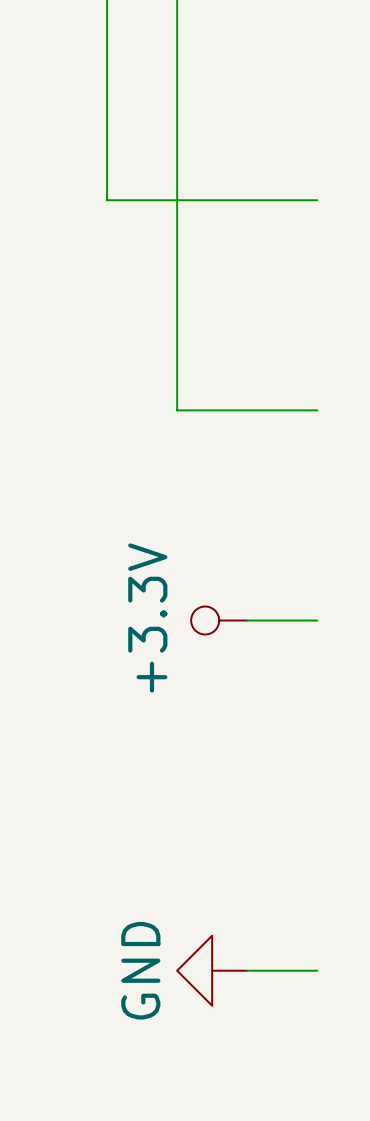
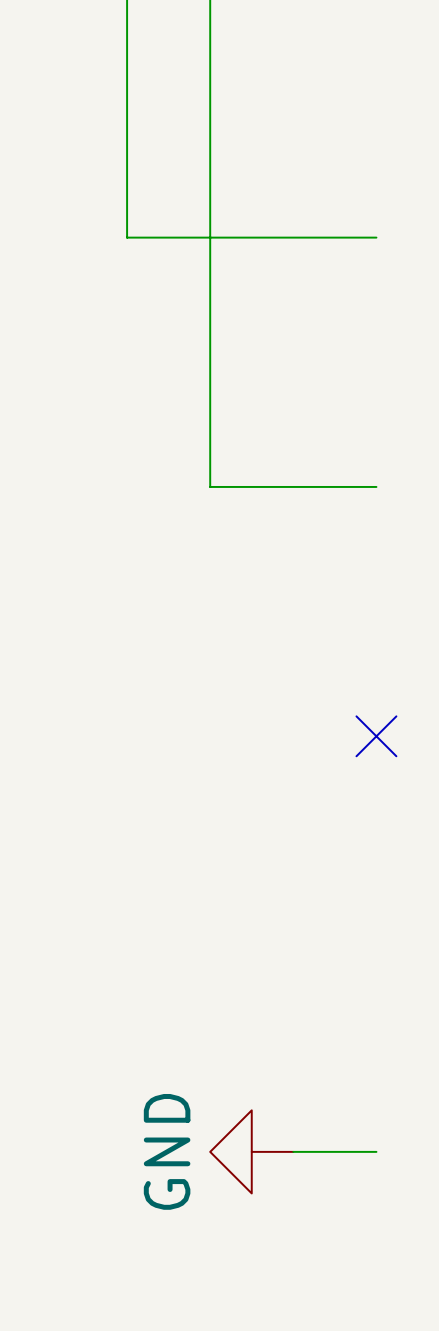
power symbol: +3.3V (219, 620) -> none
wire: (247, 620) (317, 620) -> none
no-connect mark: none -> (376, 736)

